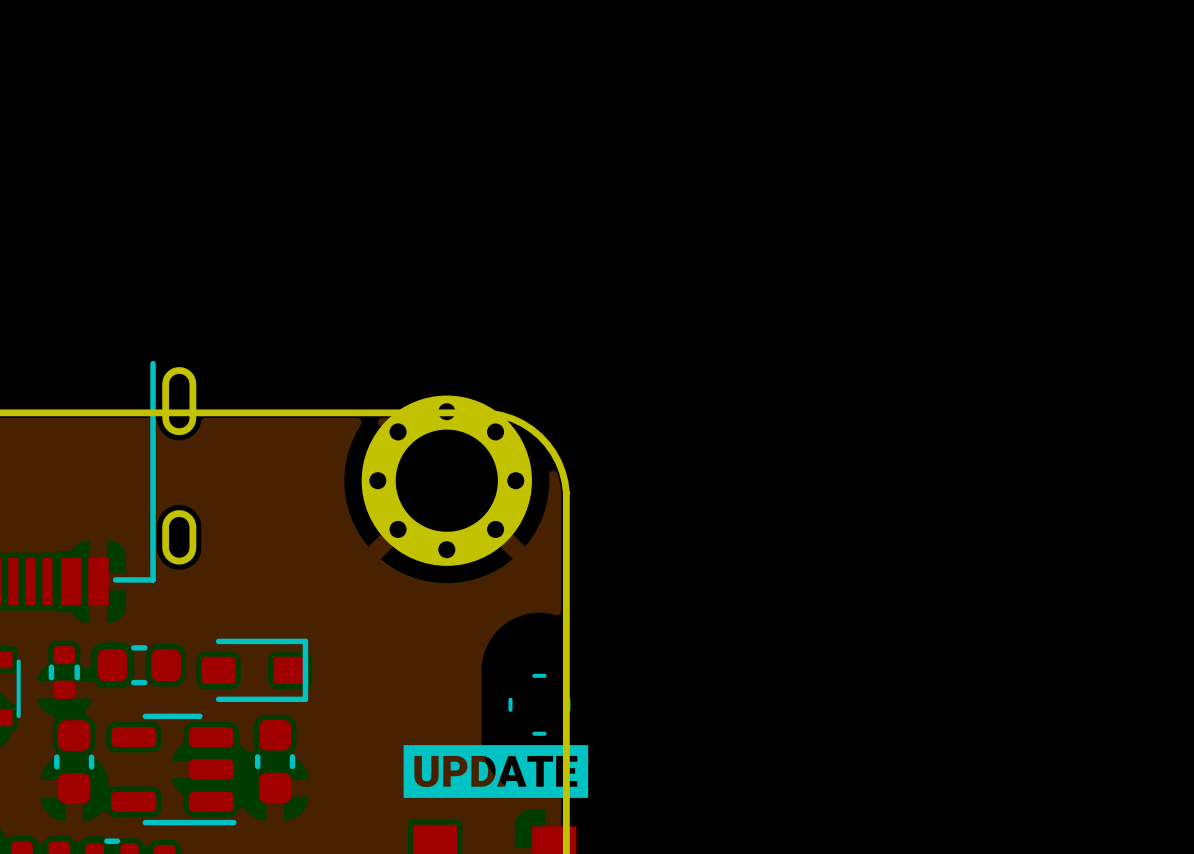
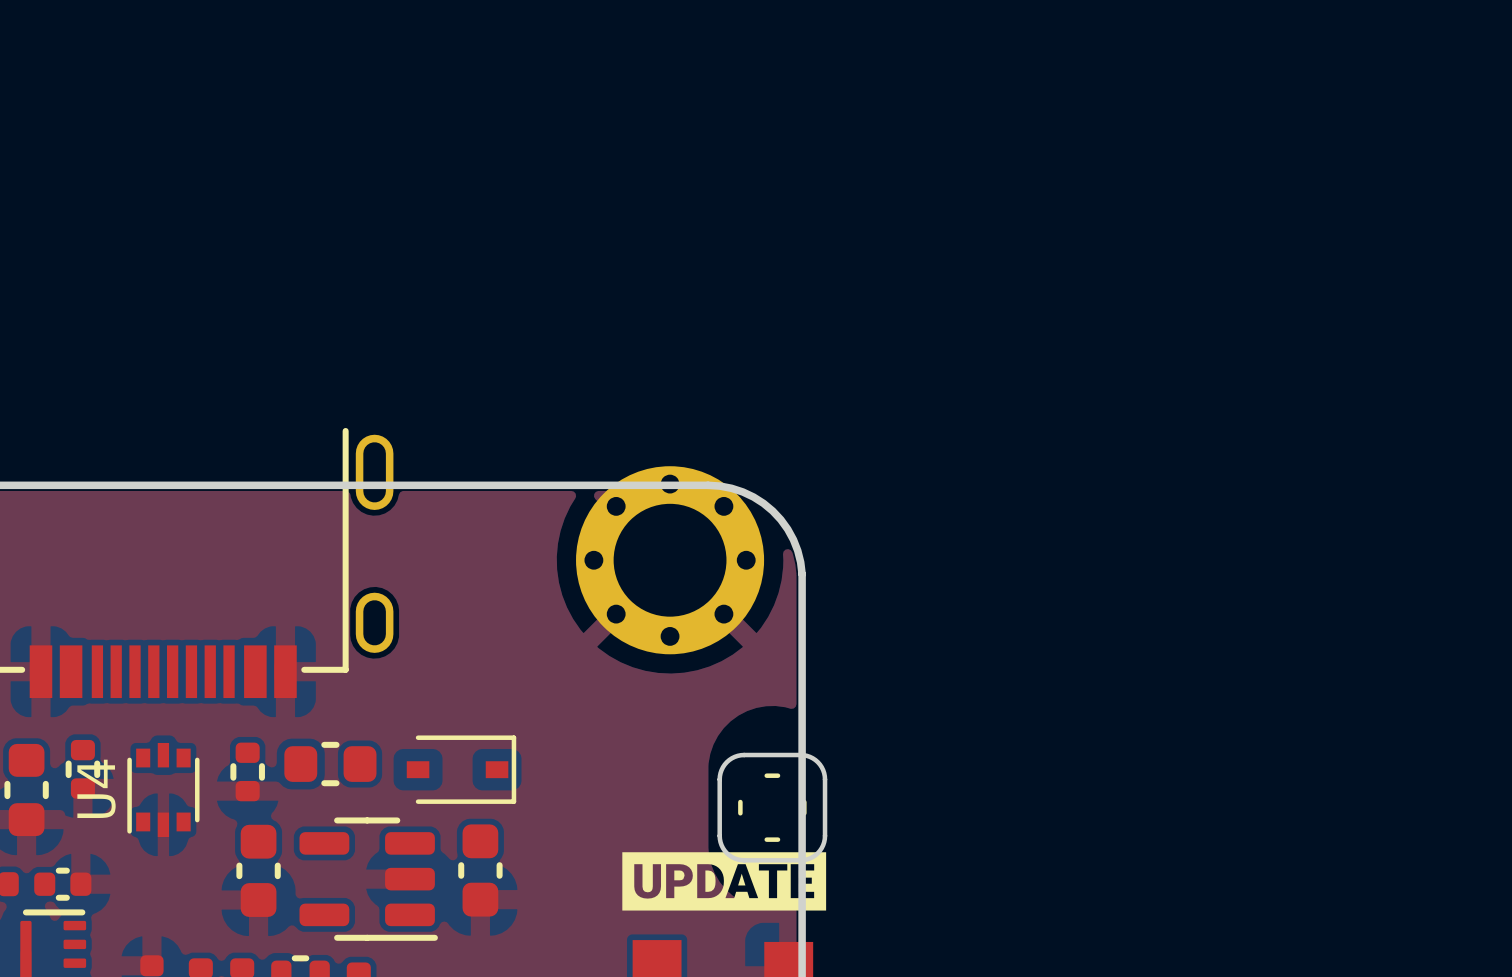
part footprint: [201, 638, 309, 703] -> [406, 735, 517, 804]
drawing: none -> [717, 752, 828, 863]

